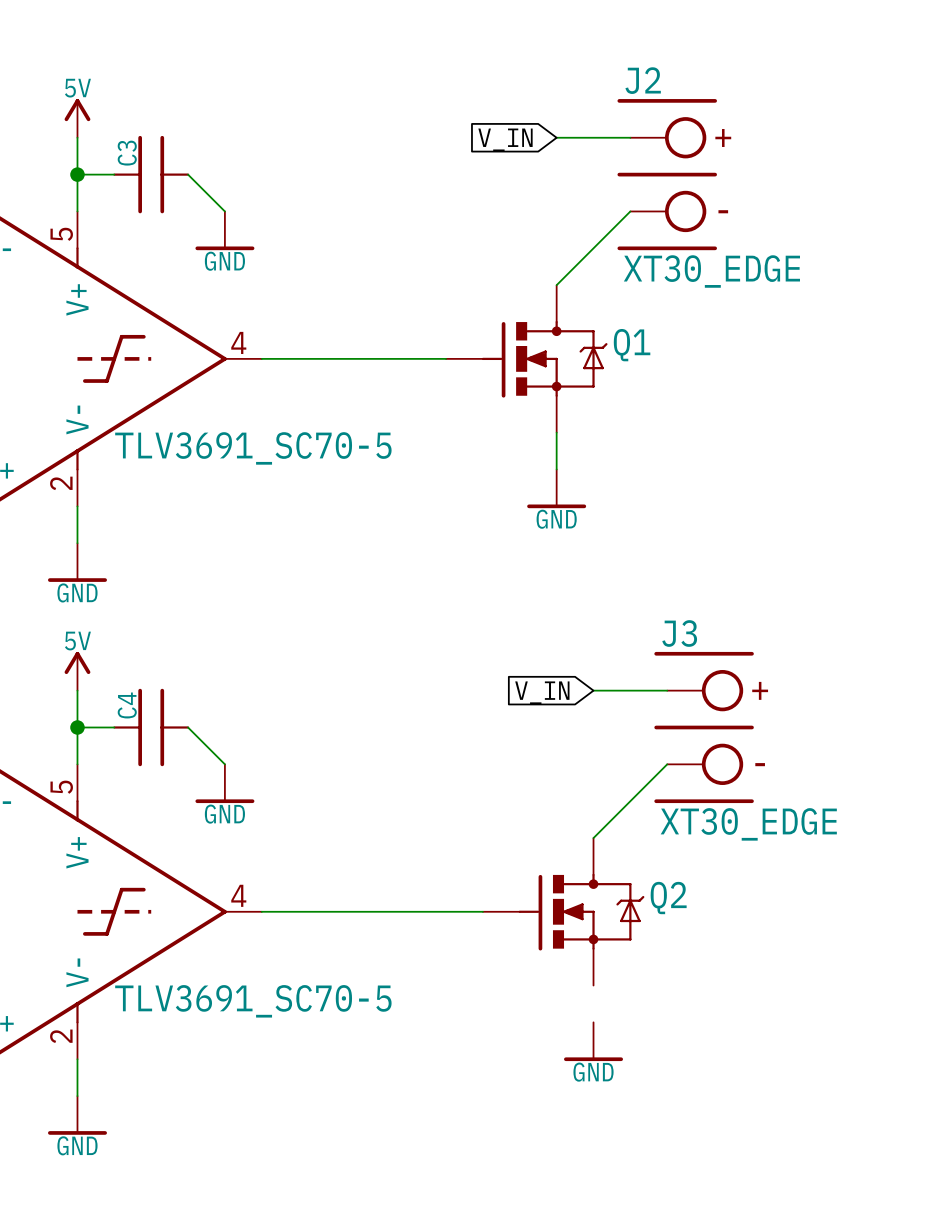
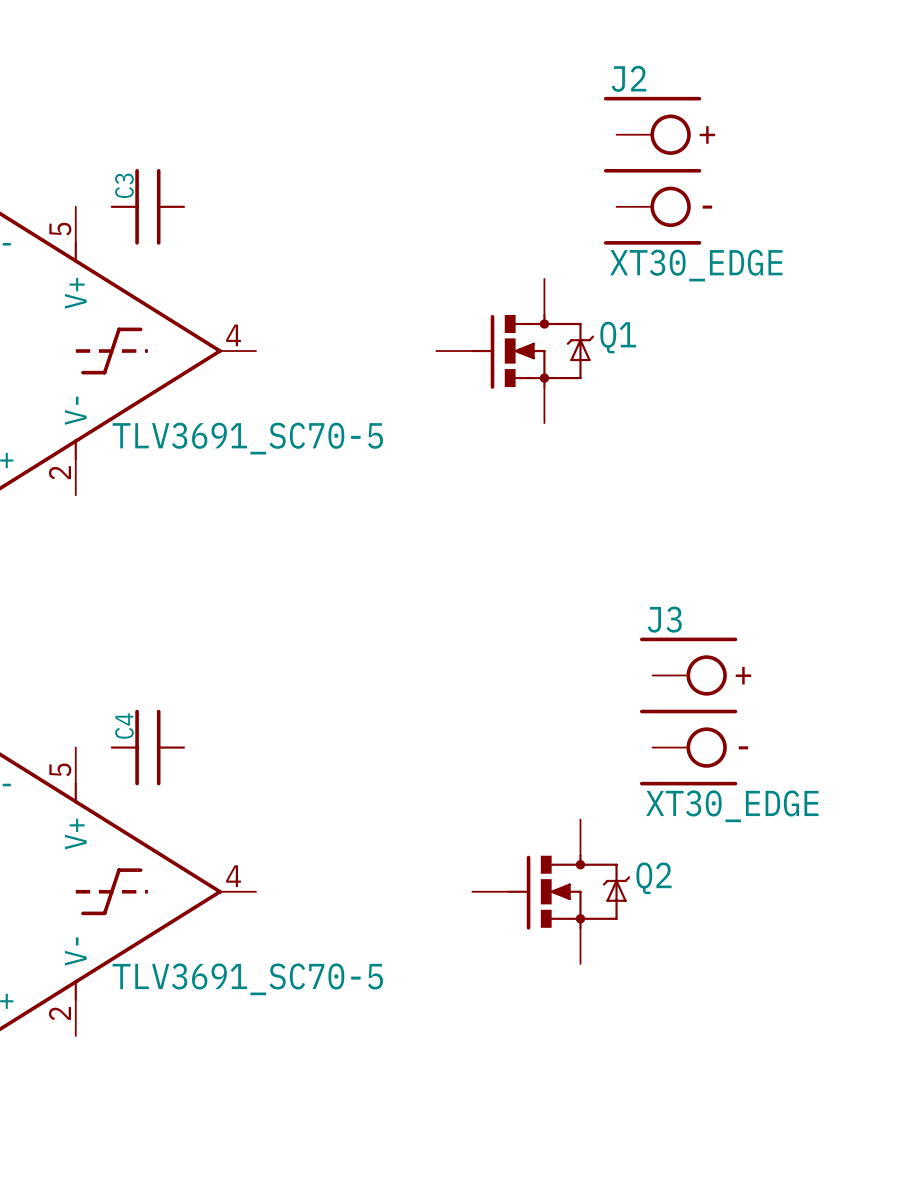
power symbol: 5V (77, 118) -> none
wire: (77, 137) (77, 211) -> none
wire: (556, 137) (630, 137) -> none
global label: V_IN (505, 139) -> none
wire: (77, 174) (114, 174) -> none
junction: (77, 174) -> none
C3 position: (151, 174) -> (147, 206)
wire: (188, 174) (224, 211) -> none
wire: (630, 211) (556, 285) -> none
power symbol: GND (224, 230) -> none
wire: (261, 358) (446, 358) -> none
wire: (556, 432) (556, 469) -> none
power symbol: GND (556, 488) -> none
wire: (77, 506) (77, 543) -> none
power symbol: GND (77, 562) -> none
power symbol: 5V (77, 671) -> none
wire: (77, 690) (77, 764) -> none
wire: (593, 690) (667, 690) -> none
global label: V_IN (542, 692) -> none
wire: (77, 727) (114, 727) -> none
junction: (77, 727) -> none
C4 position: (151, 727) -> (147, 747)
wire: (188, 727) (224, 764) -> none
wire: (667, 764) (593, 838) -> none
power symbol: GND (224, 783) -> none
wire: (261, 911) (482, 911) -> none
power symbol: GND (593, 1041) -> none
wire: (77, 1059) (77, 1096) -> none
power symbol: GND (77, 1115) -> none

